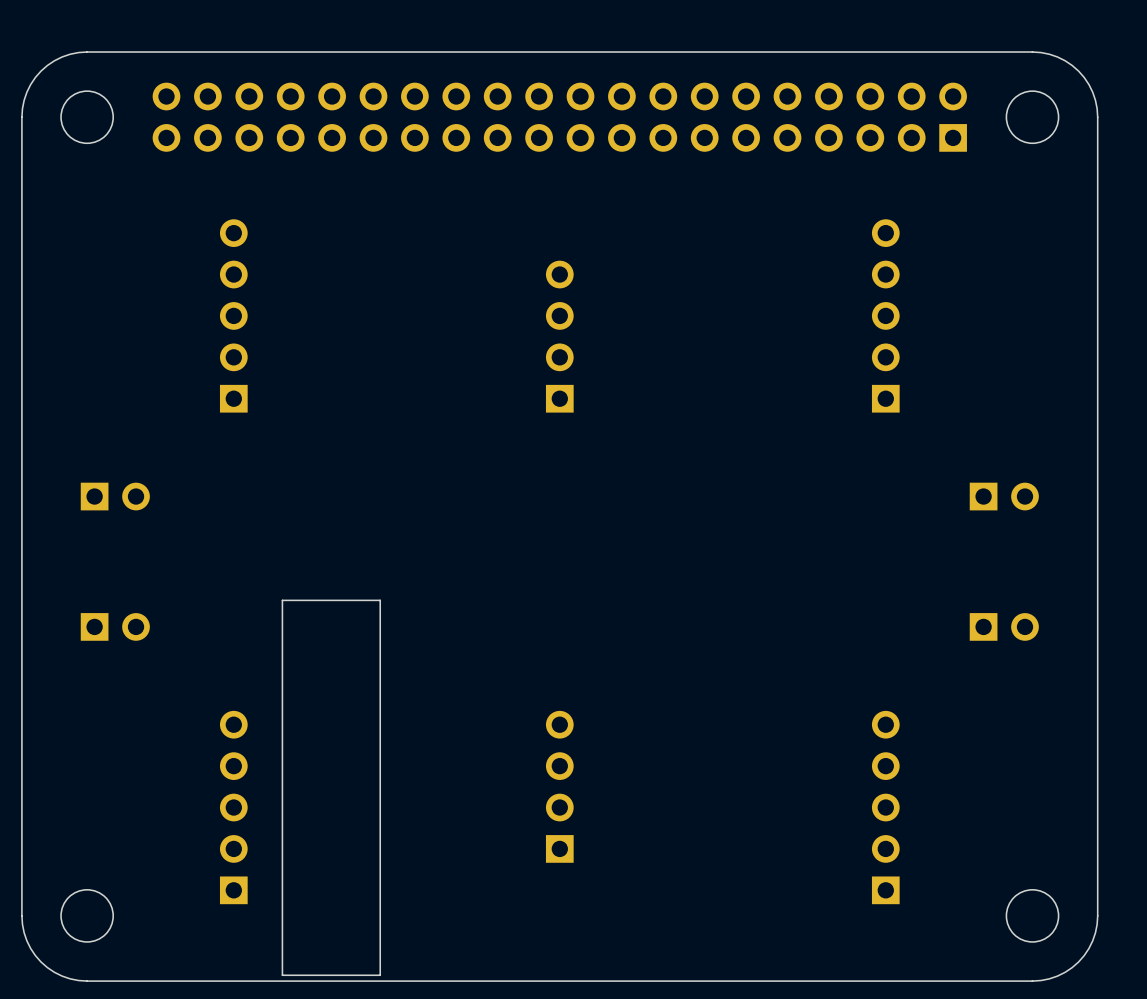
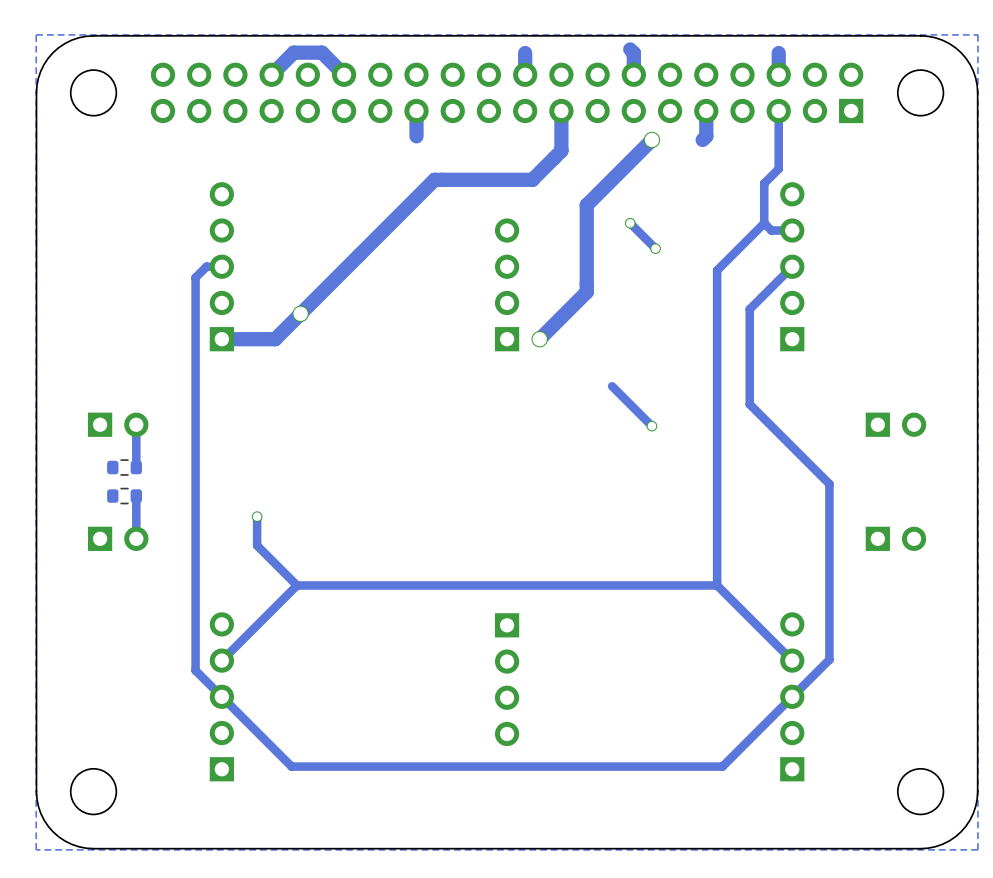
zone outline: none -> (977, 34) (36, 34) (36, 849) (977, 849) (977, 34)
track: none -> (630, 49) (633, 53) (633, 74)
track: none -> (525, 53) (525, 74)
track: none -> (778, 53) (778, 74)
track: none -> (344, 74) (321, 52) (293, 52) (271, 74)
track: none -> (416, 110) (416, 136)
track: none -> (561, 110) (561, 150) (532, 179) (434, 179) (275, 339) (221, 339)
track: none -> (706, 110) (706, 136) (702, 139)
track: none -> (778, 110) (778, 168) (764, 183) (764, 223)
track: none -> (651, 139) (586, 205) (586, 292) (539, 339)
via: none -> (651, 139)
track: none -> (630, 223) (655, 248)
via: none -> (630, 223)
track: none -> (764, 223) (717, 270) (717, 585)
track: none -> (764, 223) (771, 230) (792, 230)
via: none -> (655, 248)
track: none -> (792, 266) (749, 309) (749, 404) (829, 484) (829, 659) (722, 766) (291, 766) (195, 670) (195, 277) (206, 266) (221, 266)
via: none -> (300, 313)
via: none -> (539, 339)
track: none -> (612, 386) (651, 426)
track: none -> (136, 424) (136, 467)
via: none -> (651, 426)
part: none -> (124, 467)
part: none -> (124, 496)
track: none -> (136, 496) (136, 538)
board edge: (380, 600) (282, 600) (282, 975) (380, 975) (380, 600) -> none
track: none -> (257, 516) (257, 545) (296, 585)
via: none -> (257, 516)
track: none -> (296, 585) (221, 660)
track: none -> (717, 585) (792, 660)
track: none -> (717, 585) (296, 585)
part rotation: 0° (559, 786) -> 180° (507, 679)

